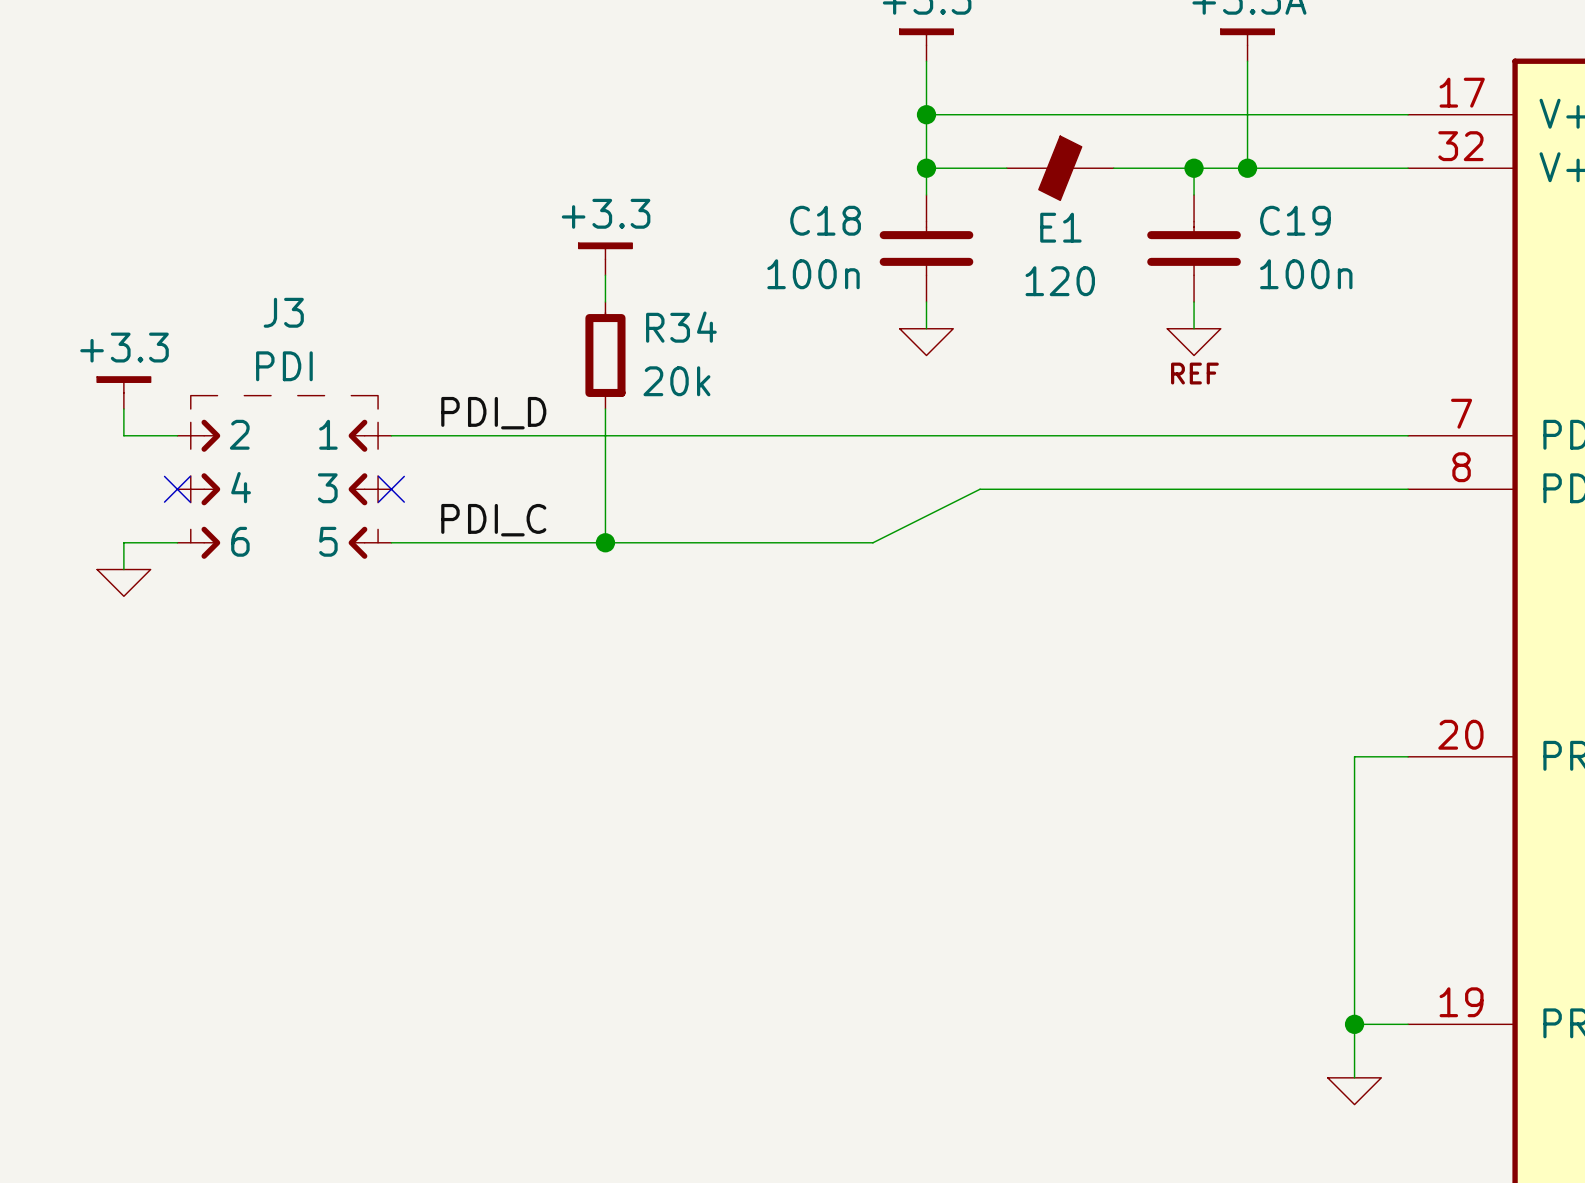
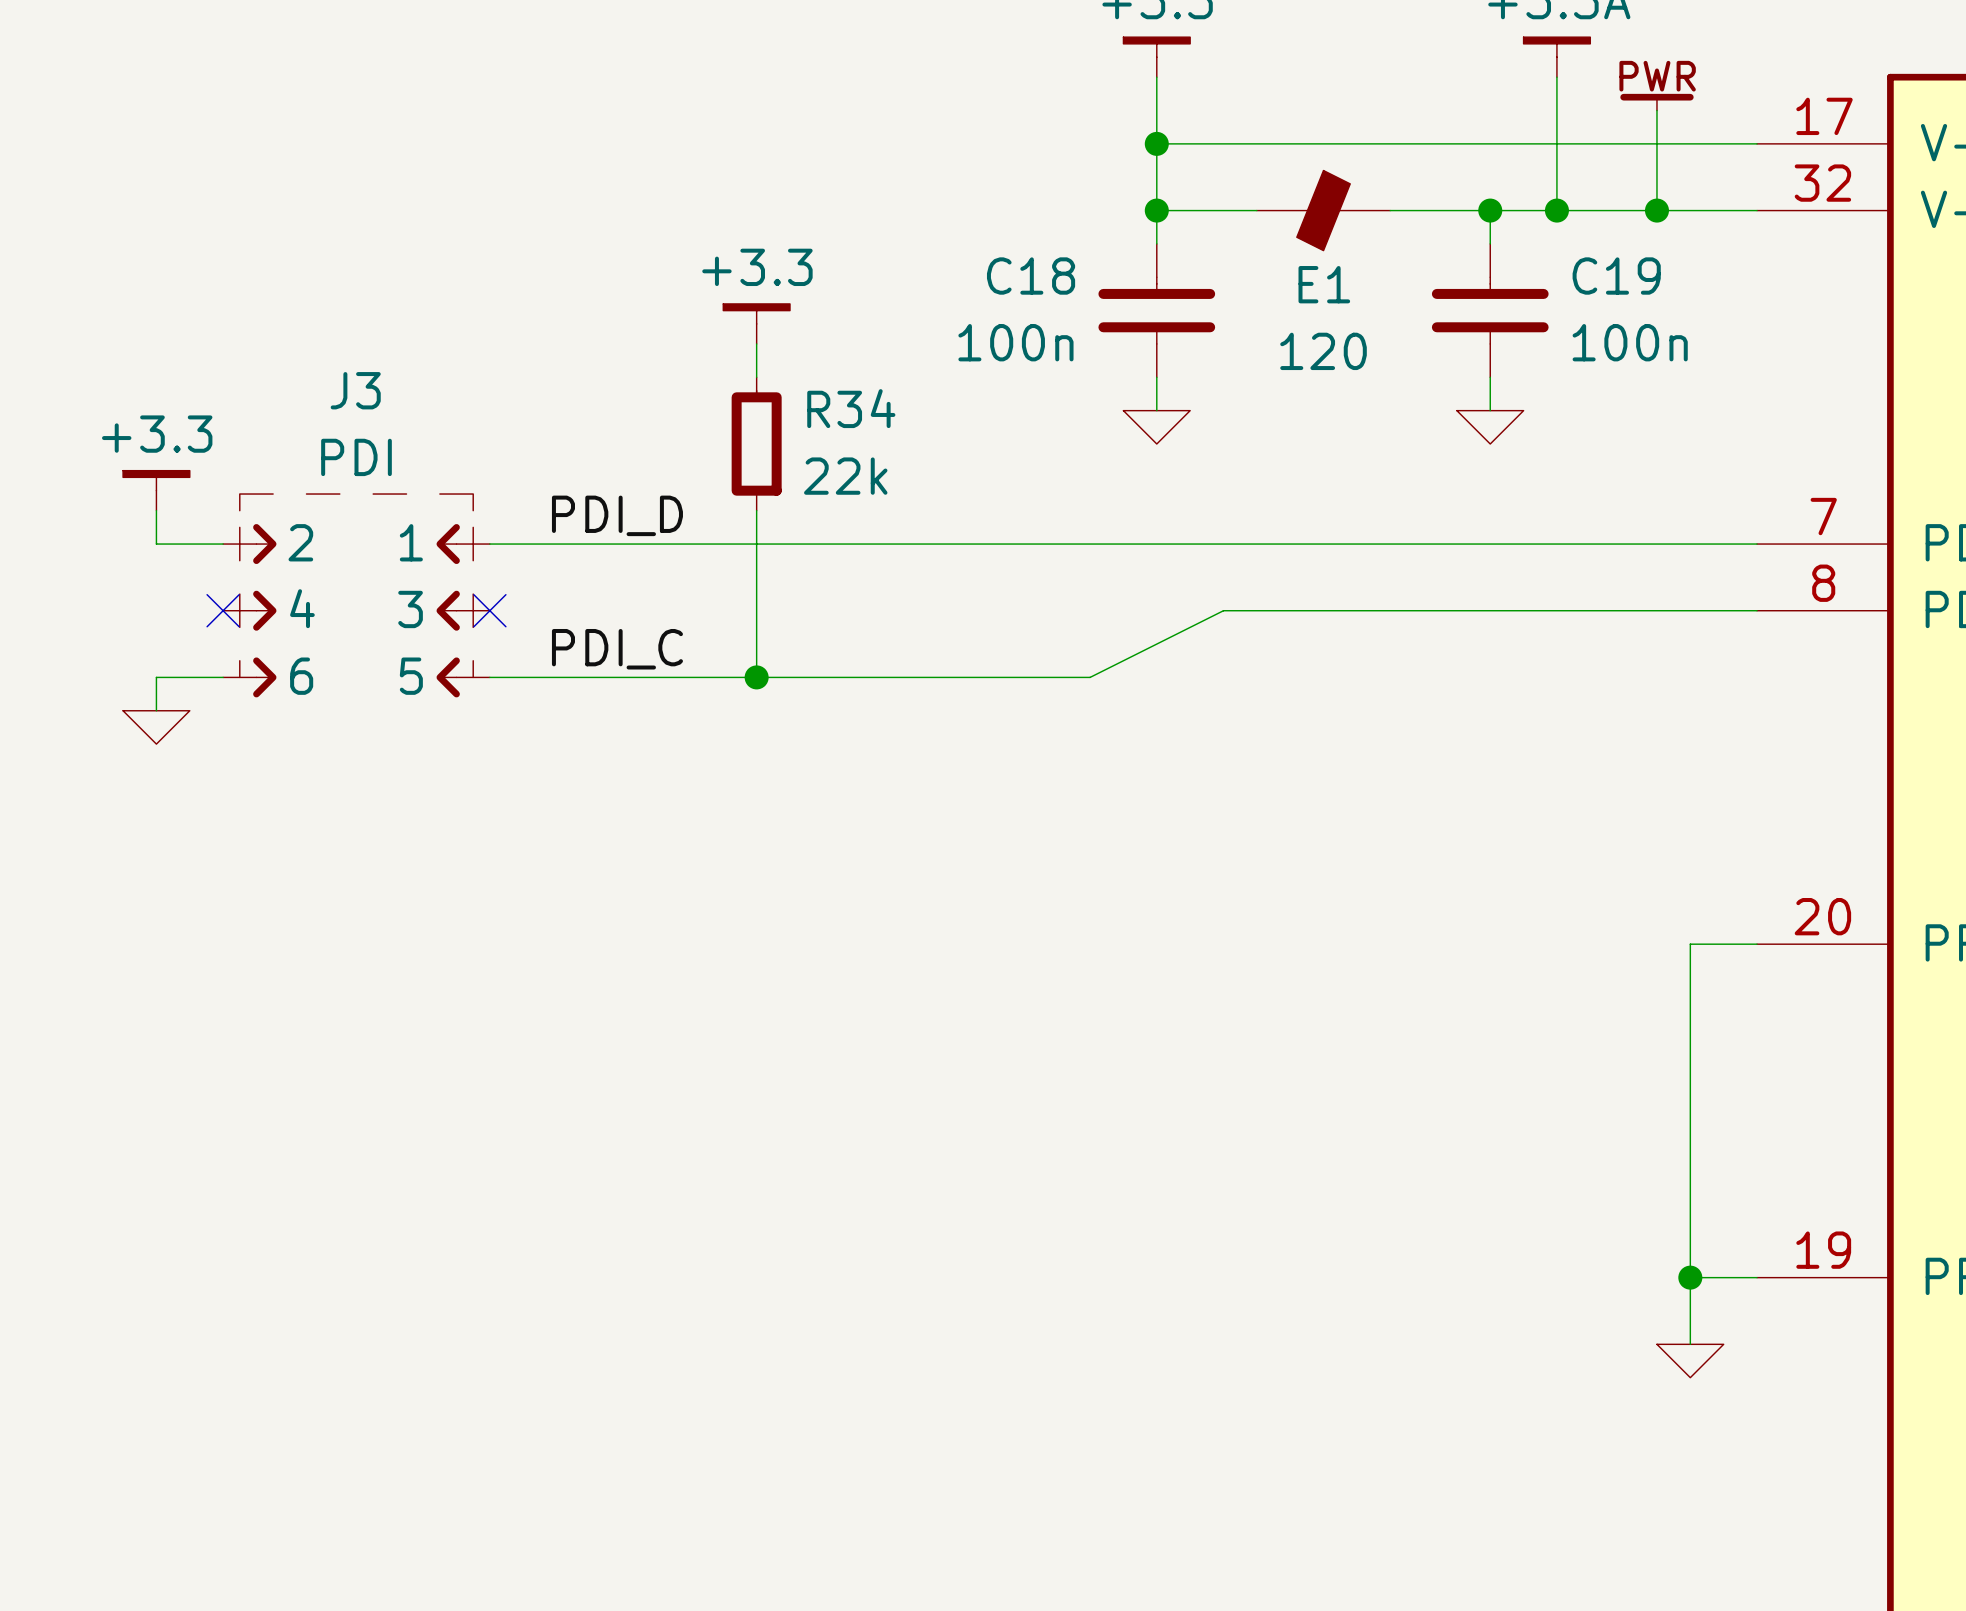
power symbol: none -> (1656, 102)
wire: none -> (1656, 110) (1656, 210)
junction: none -> (1656, 210)
power symbol text: REF (1194, 373) -> none
R34 value: 20k (676, 381) -> 22k (845, 476)

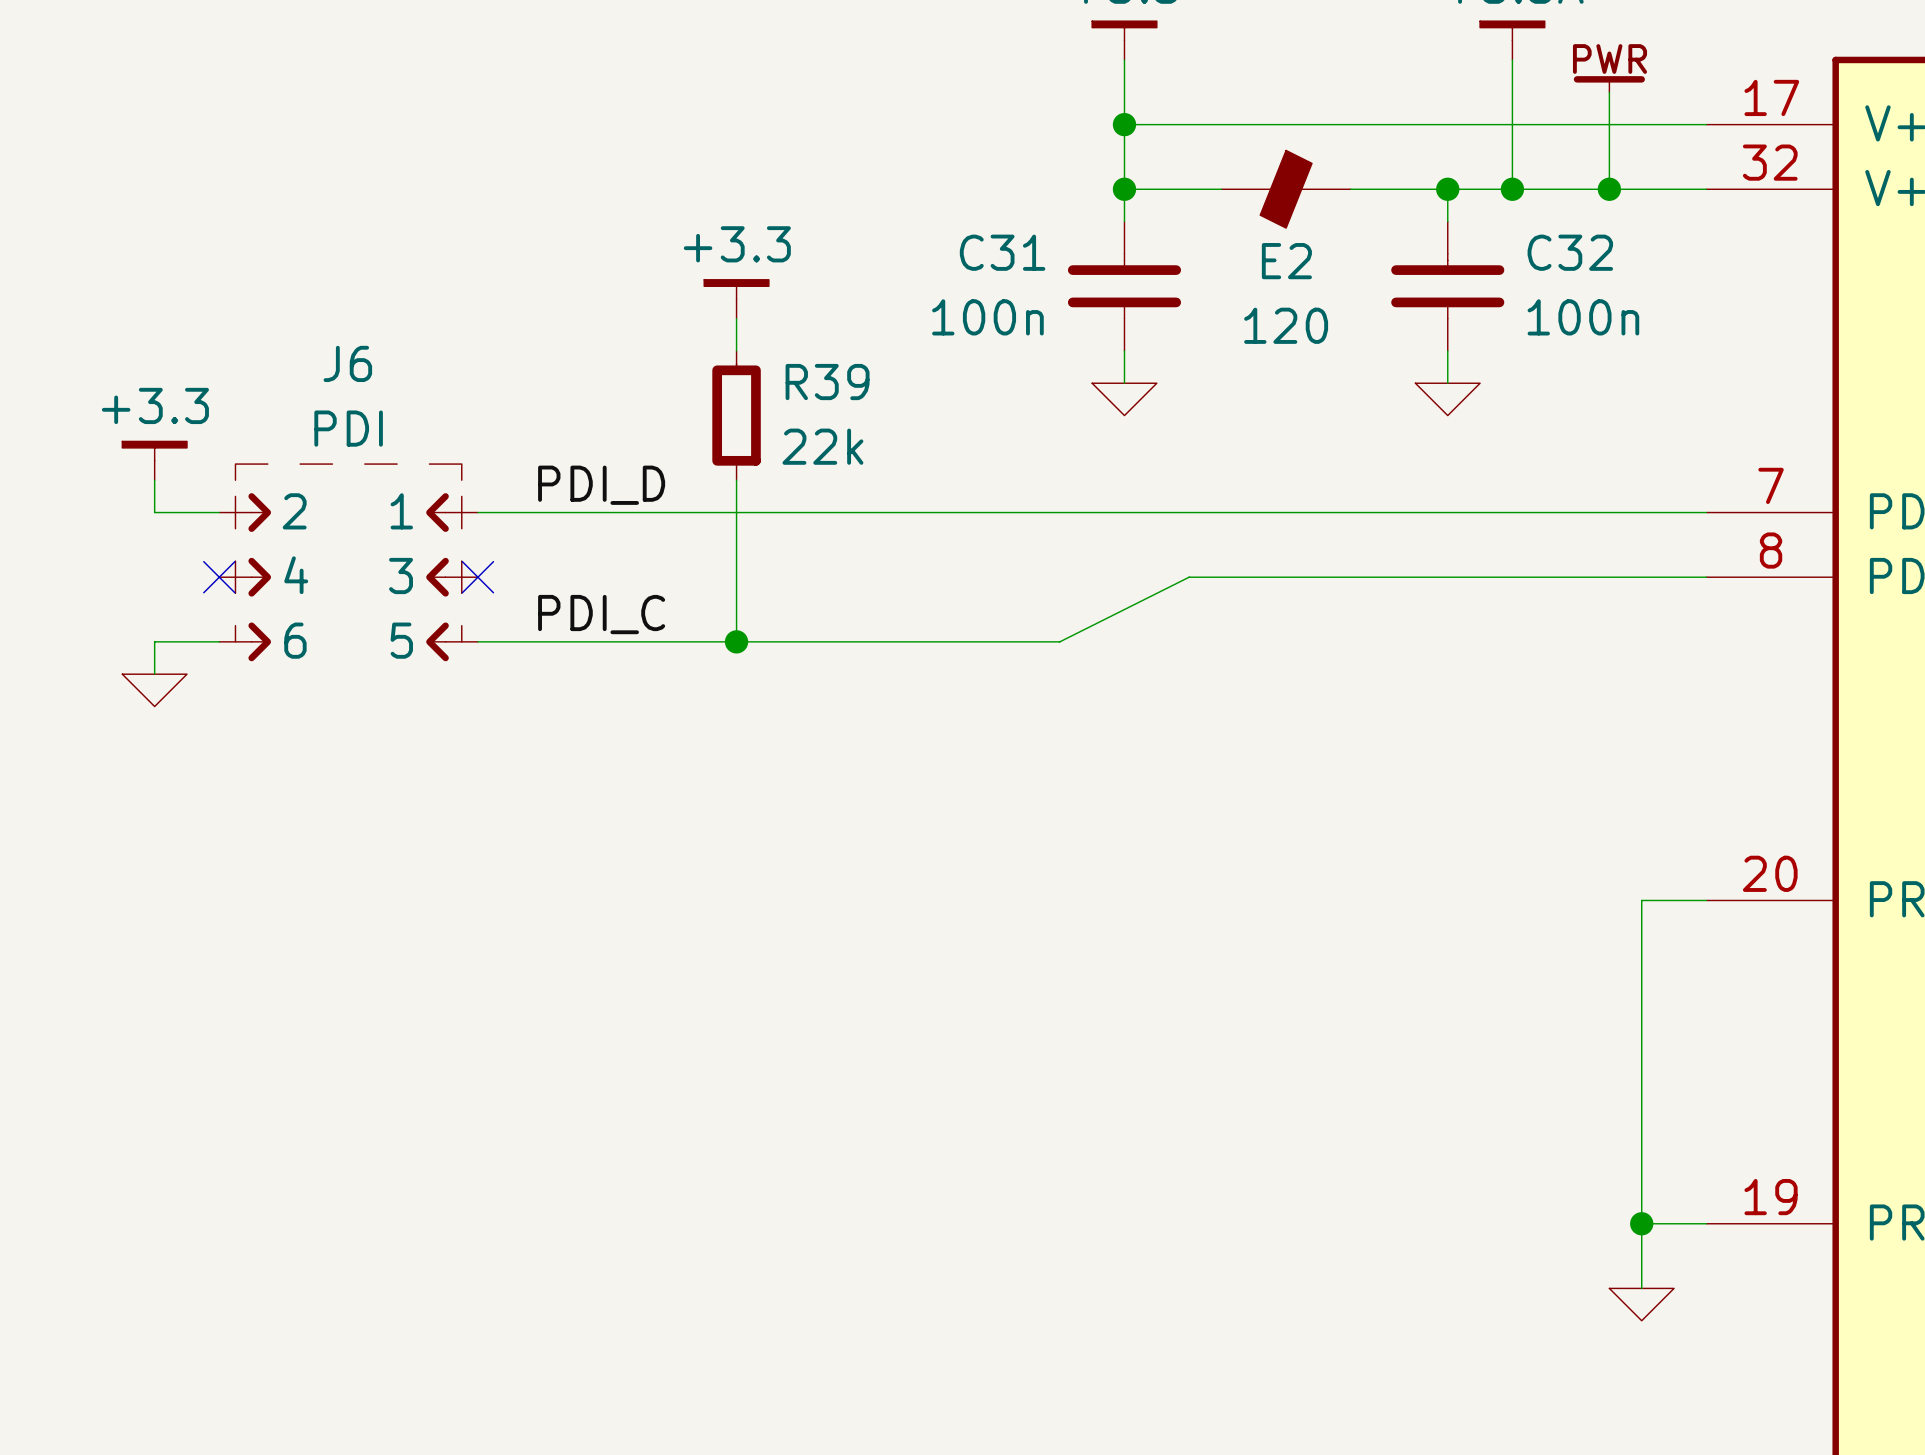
C18 name: C18 (1031, 276) -> C31 (1002, 252)
C19 name: C19 (1616, 276) -> C32 (1570, 252)
E1 name: E1 (1324, 284) -> E2 (1286, 261)
J3 name: J3 (355, 390) -> J6 (347, 363)
R34 name: R34 (851, 408) -> R39 (827, 382)

